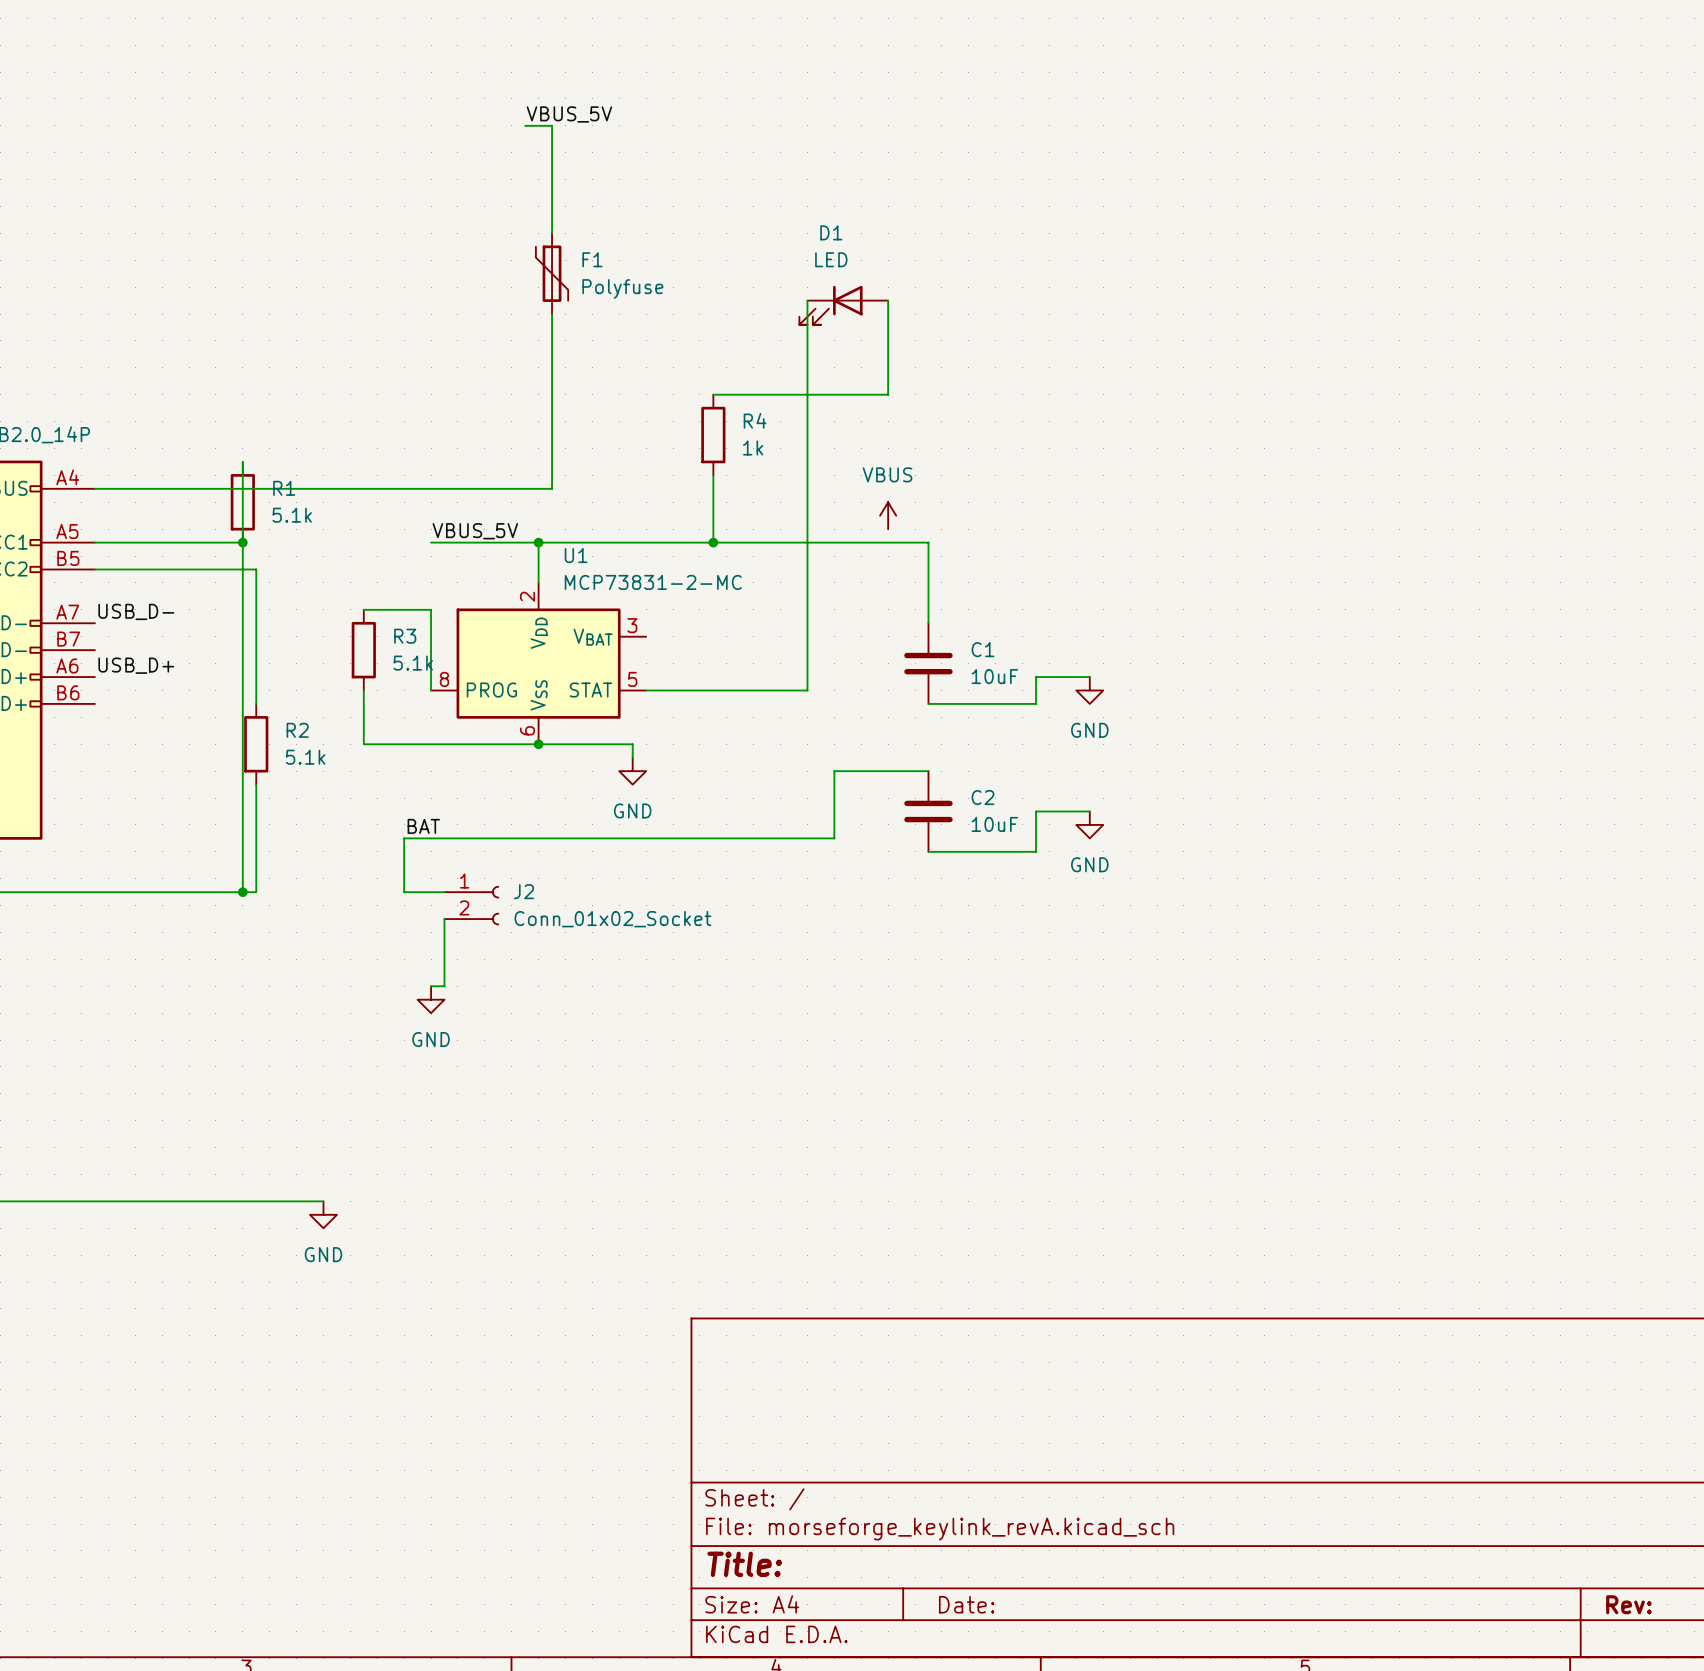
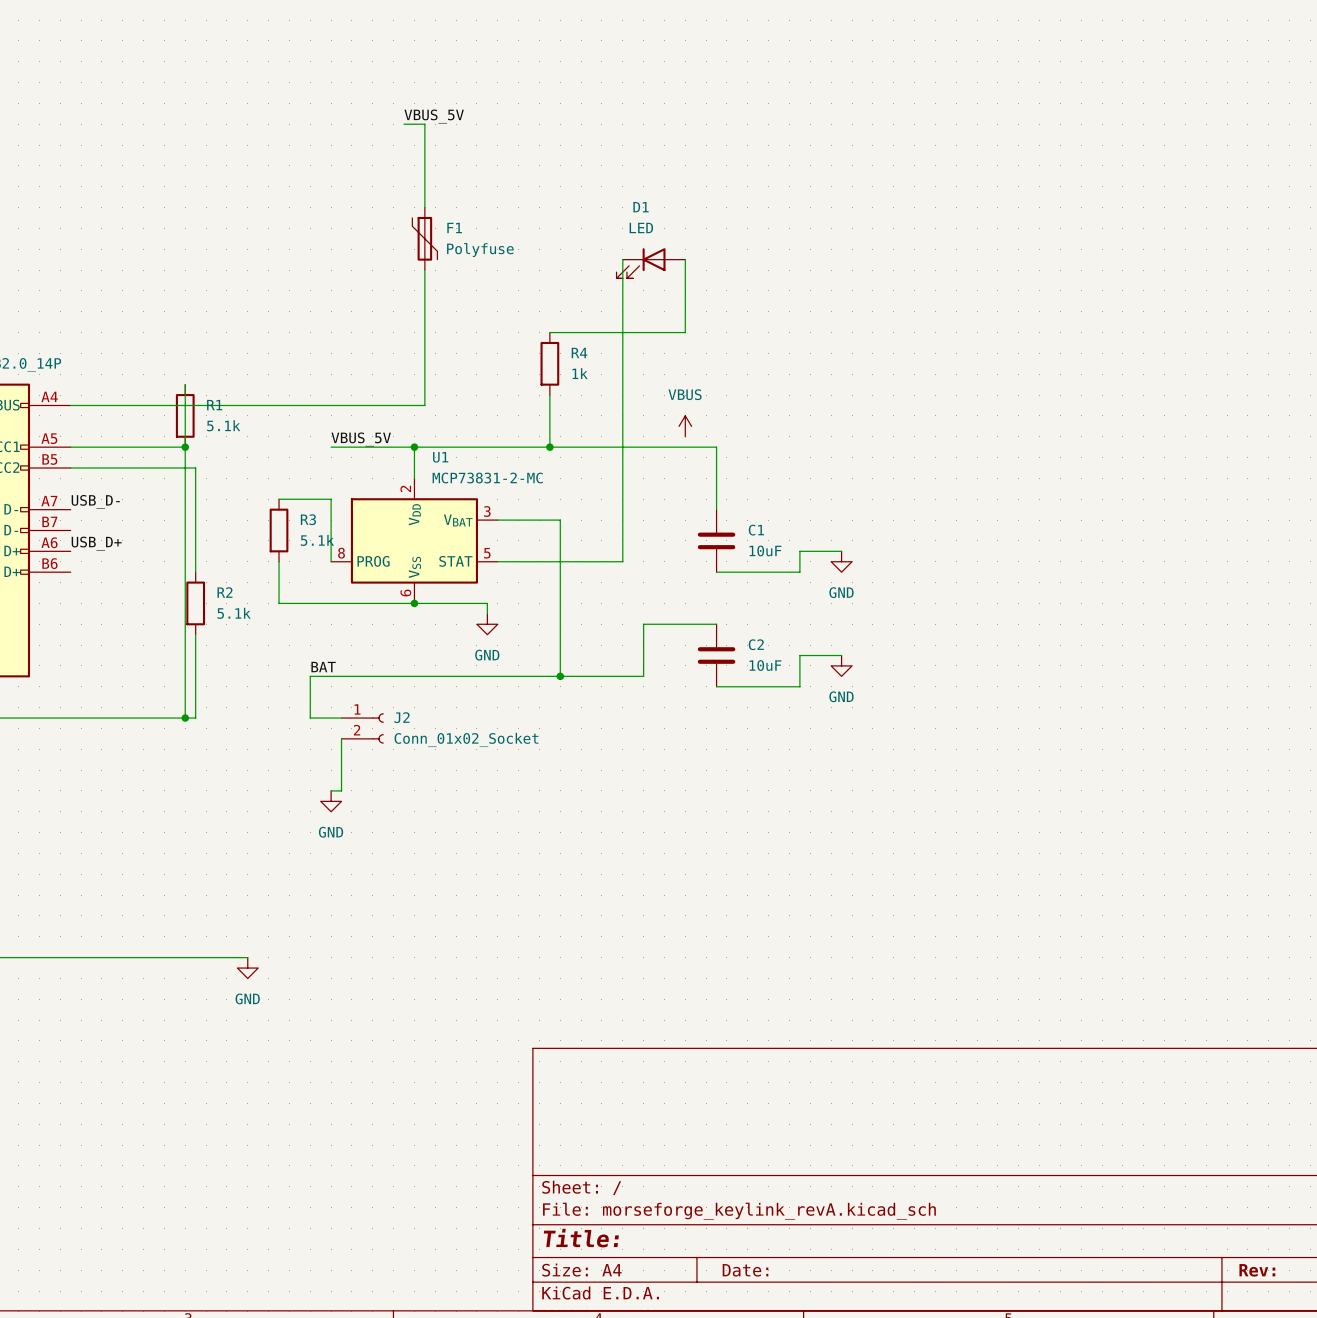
wire: none -> (497, 520) (560, 520) (560, 676)
junction: none -> (560, 676)

